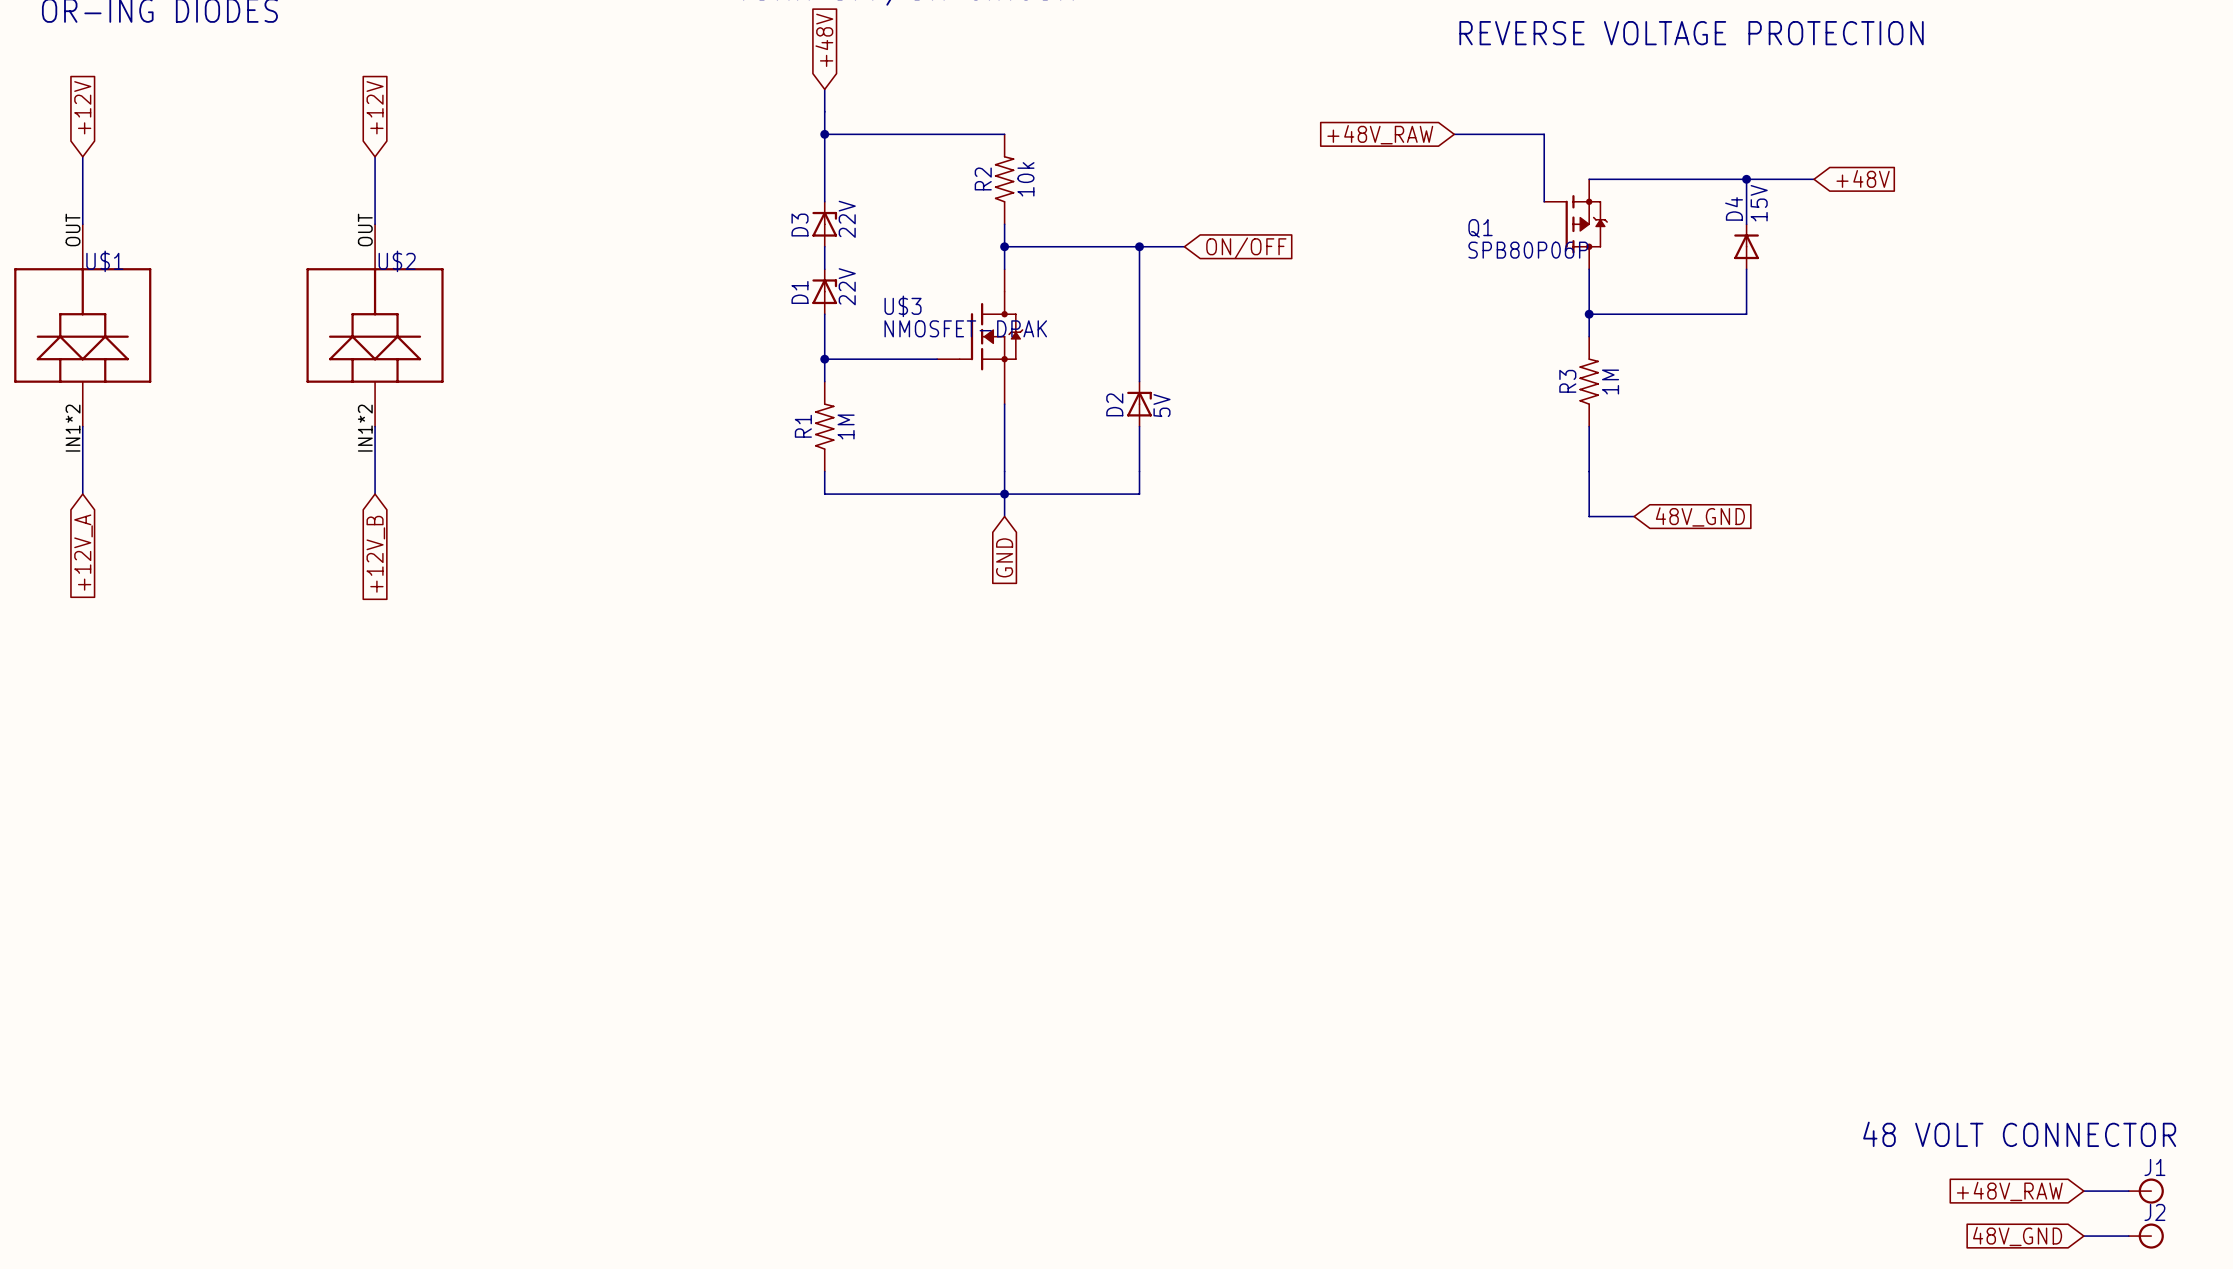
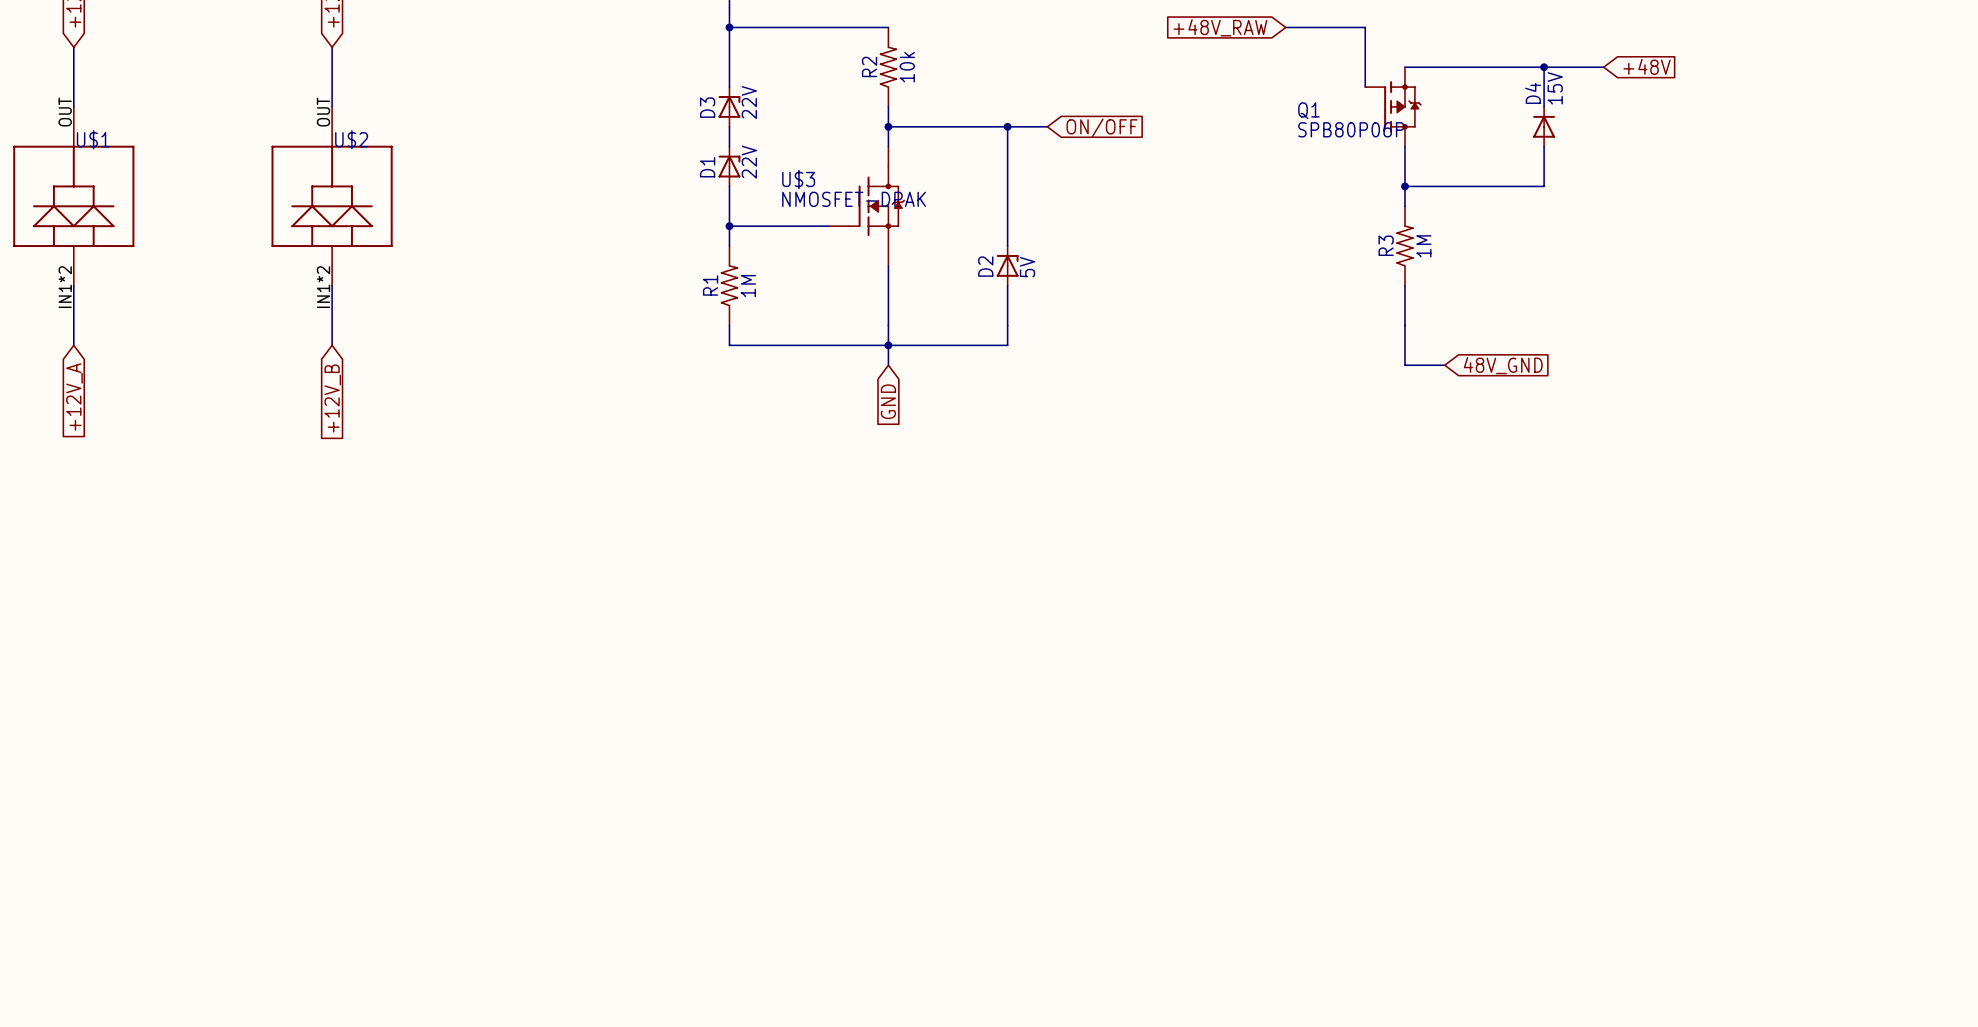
text: 48 VOLT CONNECTOR (2019, 1134) -> none
global label: +48V_RAW (2009, 1191) -> none
wire: (2083, 1191) (2128, 1191) -> none
J1: (2146, 1191) -> none
global label: 48V_GND (2017, 1236) -> none
wire: (2083, 1236) (2128, 1236) -> none
J2: (2146, 1236) -> none

